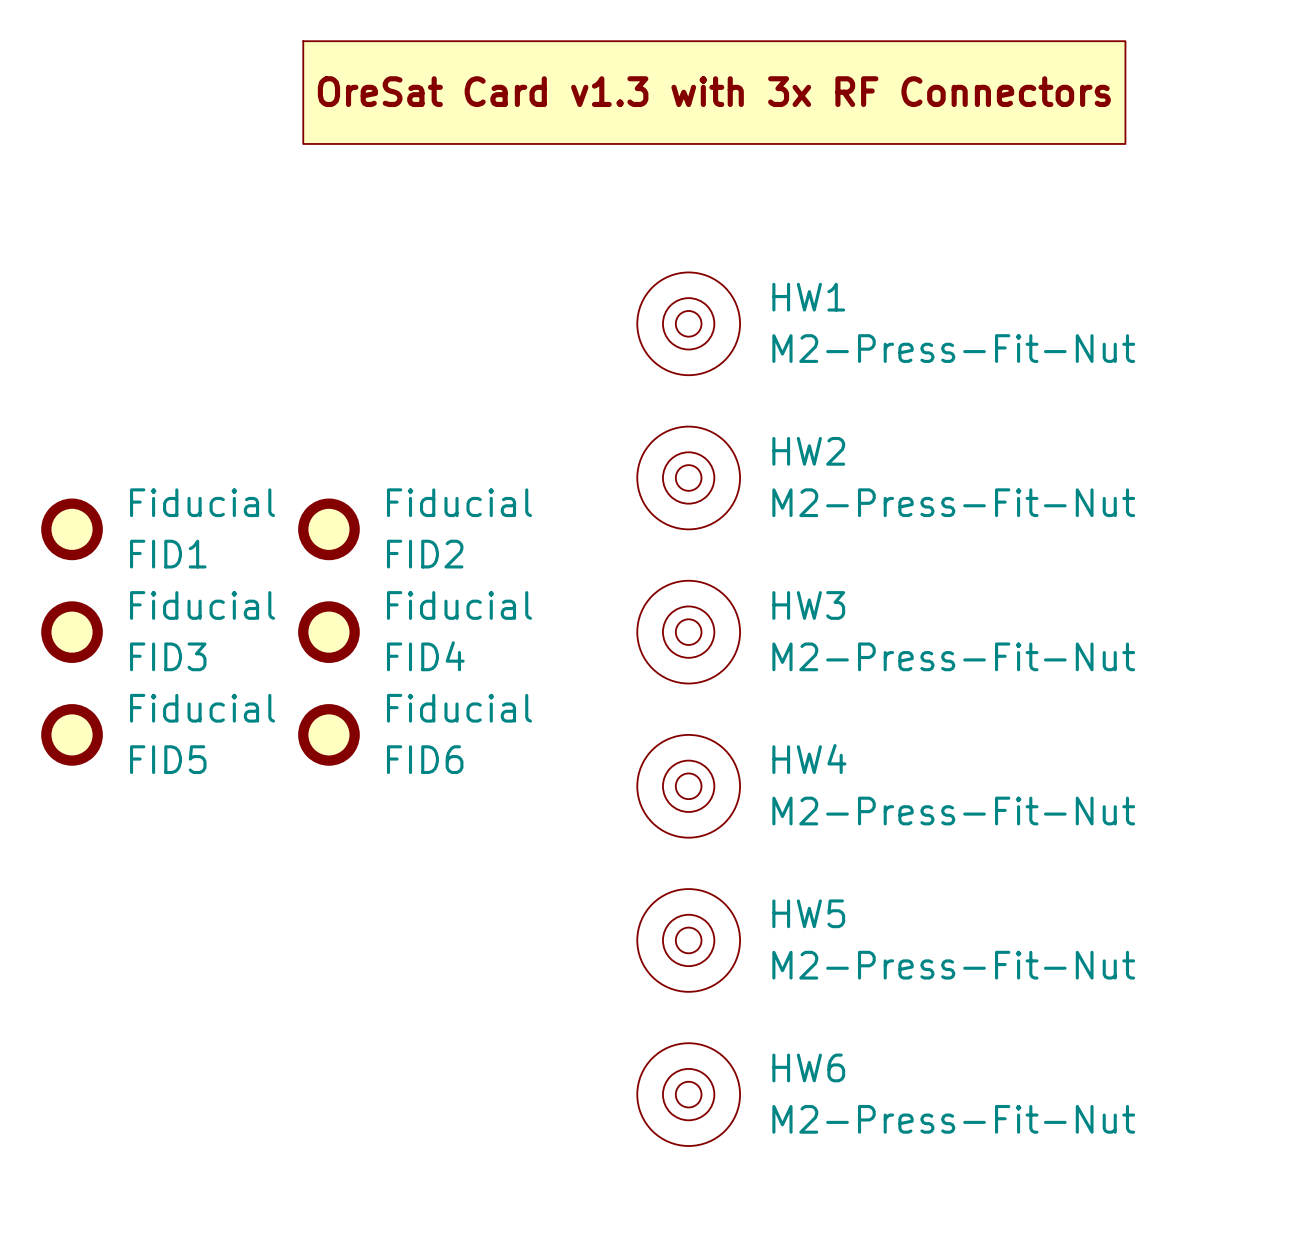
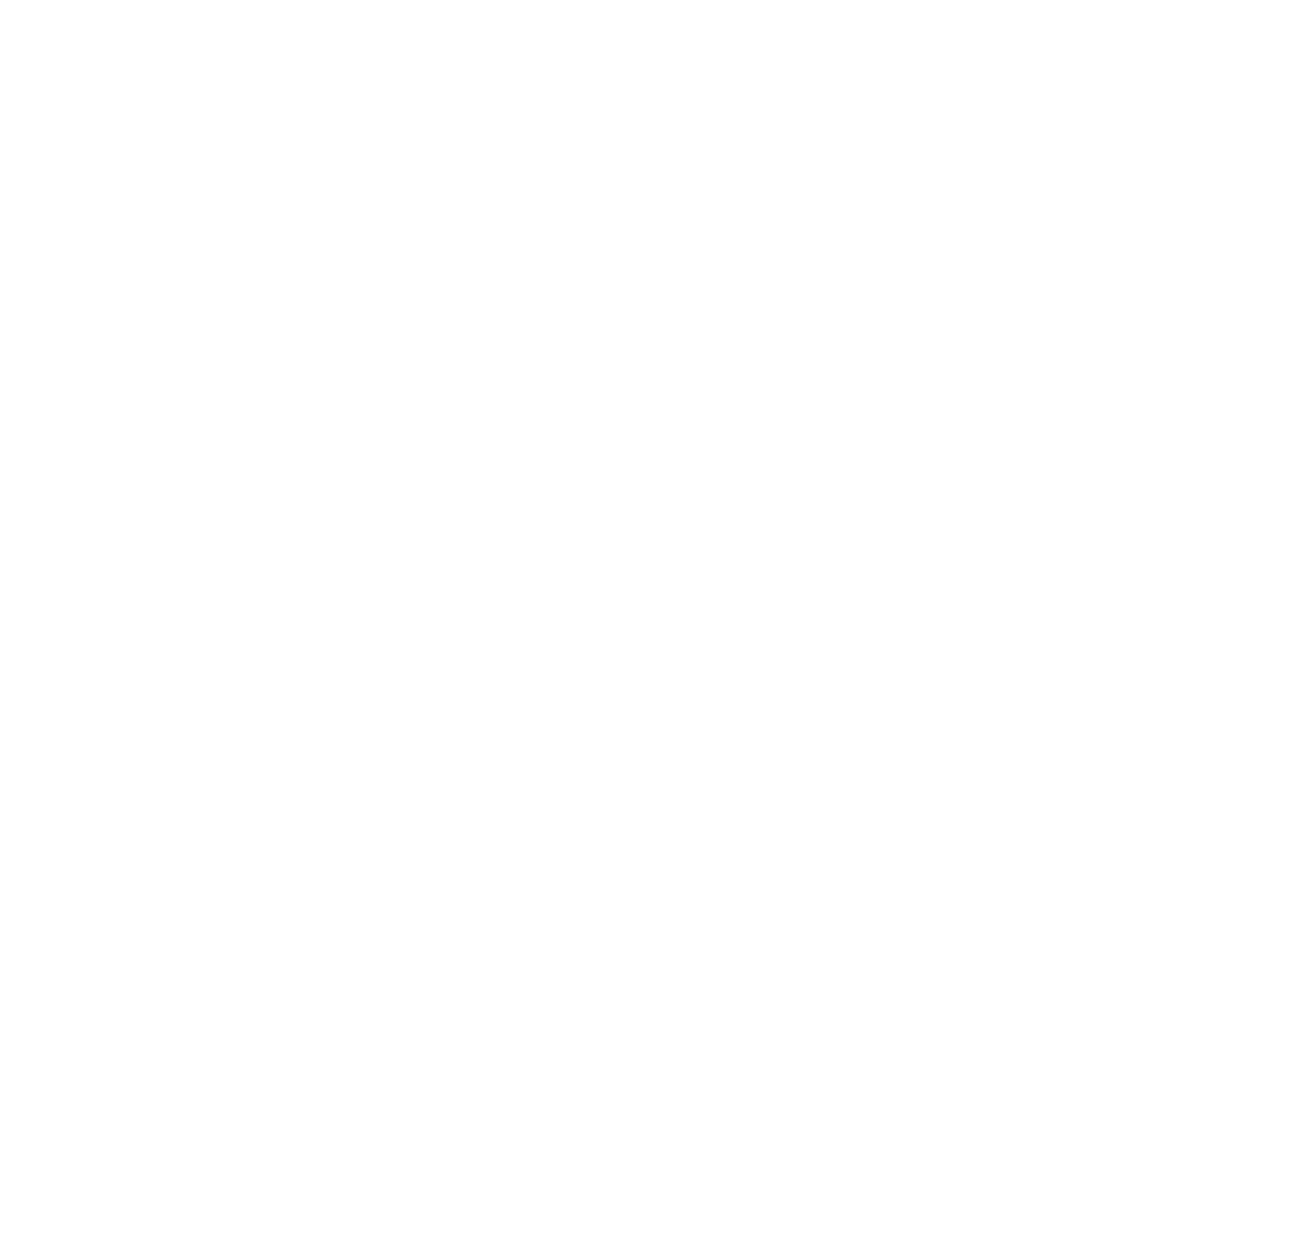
part: (714, 92) -> none
HW1: M2-Press-Fit-Nut (688, 323) -> none
HW2: M2-Press-Fit-Nut (688, 477) -> none
FID1: Fiducial (72, 529) -> none
FID2: Fiducial (328, 529) -> none
FID3: Fiducial (72, 632) -> none
FID4: Fiducial (328, 632) -> none
HW3: M2-Press-Fit-Nut (688, 632) -> none
FID5: Fiducial (72, 734) -> none
FID6: Fiducial (328, 734) -> none
HW4: M2-Press-Fit-Nut (688, 786) -> none
HW5: M2-Press-Fit-Nut (688, 940) -> none
HW6: M2-Press-Fit-Nut (688, 1094) -> none

